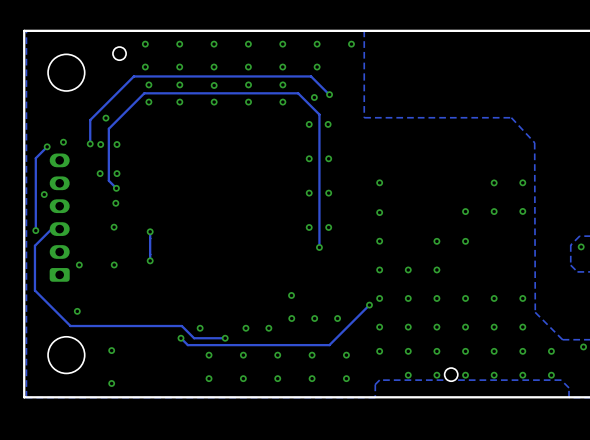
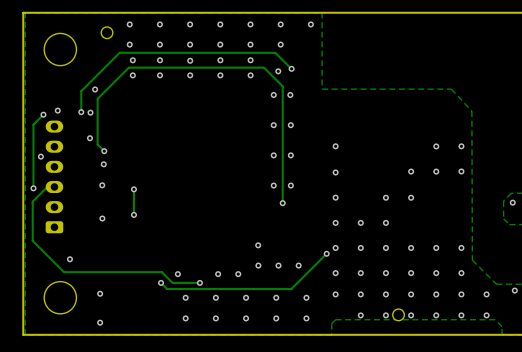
via: (116, 144) -> none
via: (116, 173) -> none
via: (79, 264) -> none

